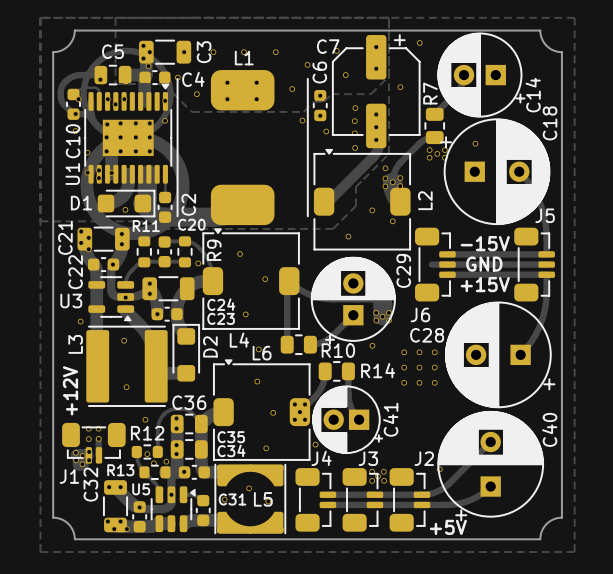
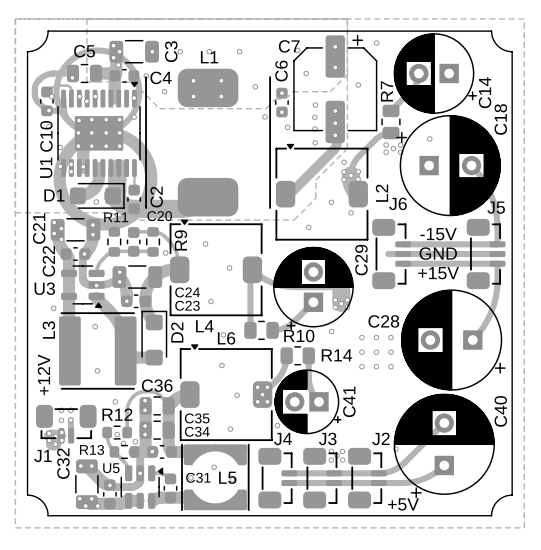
via: (307, 64) -> none
J6 name position: J6 (420, 314) -> J6 (398, 203)

